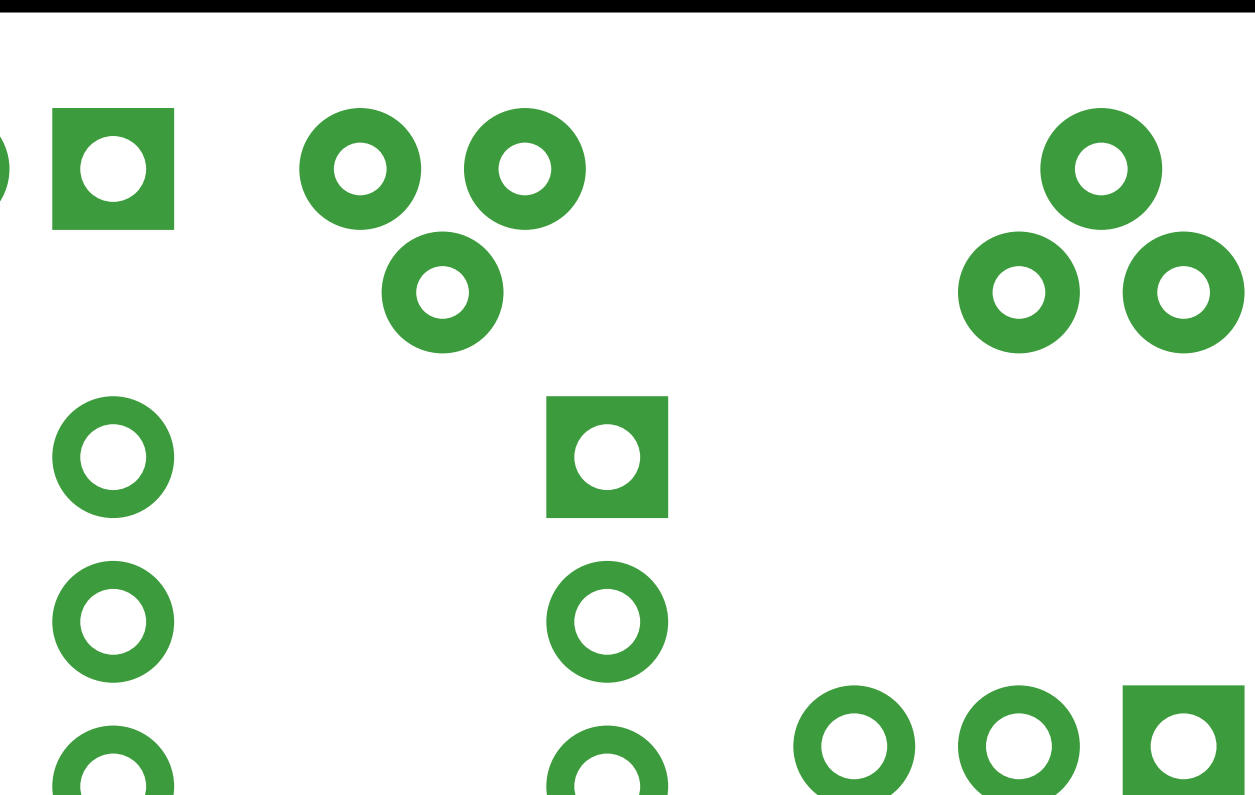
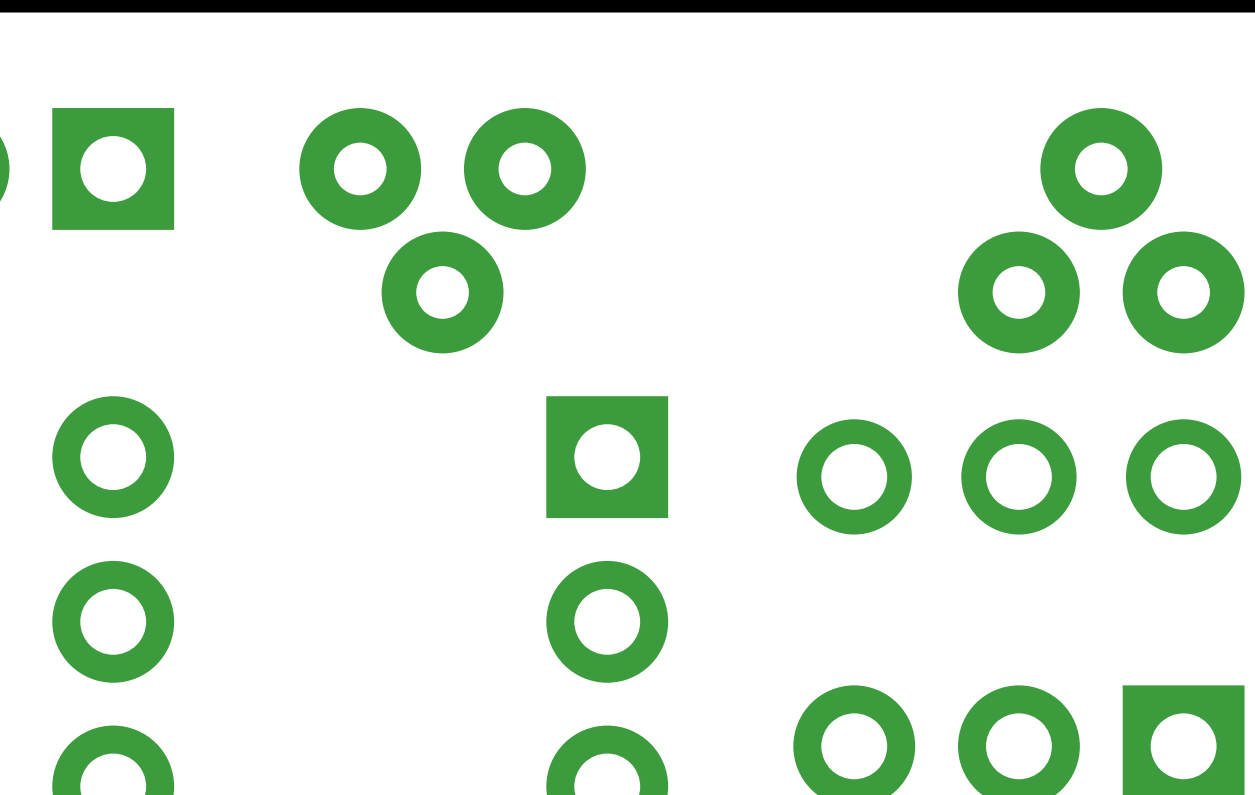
part: none -> (1018, 476)

